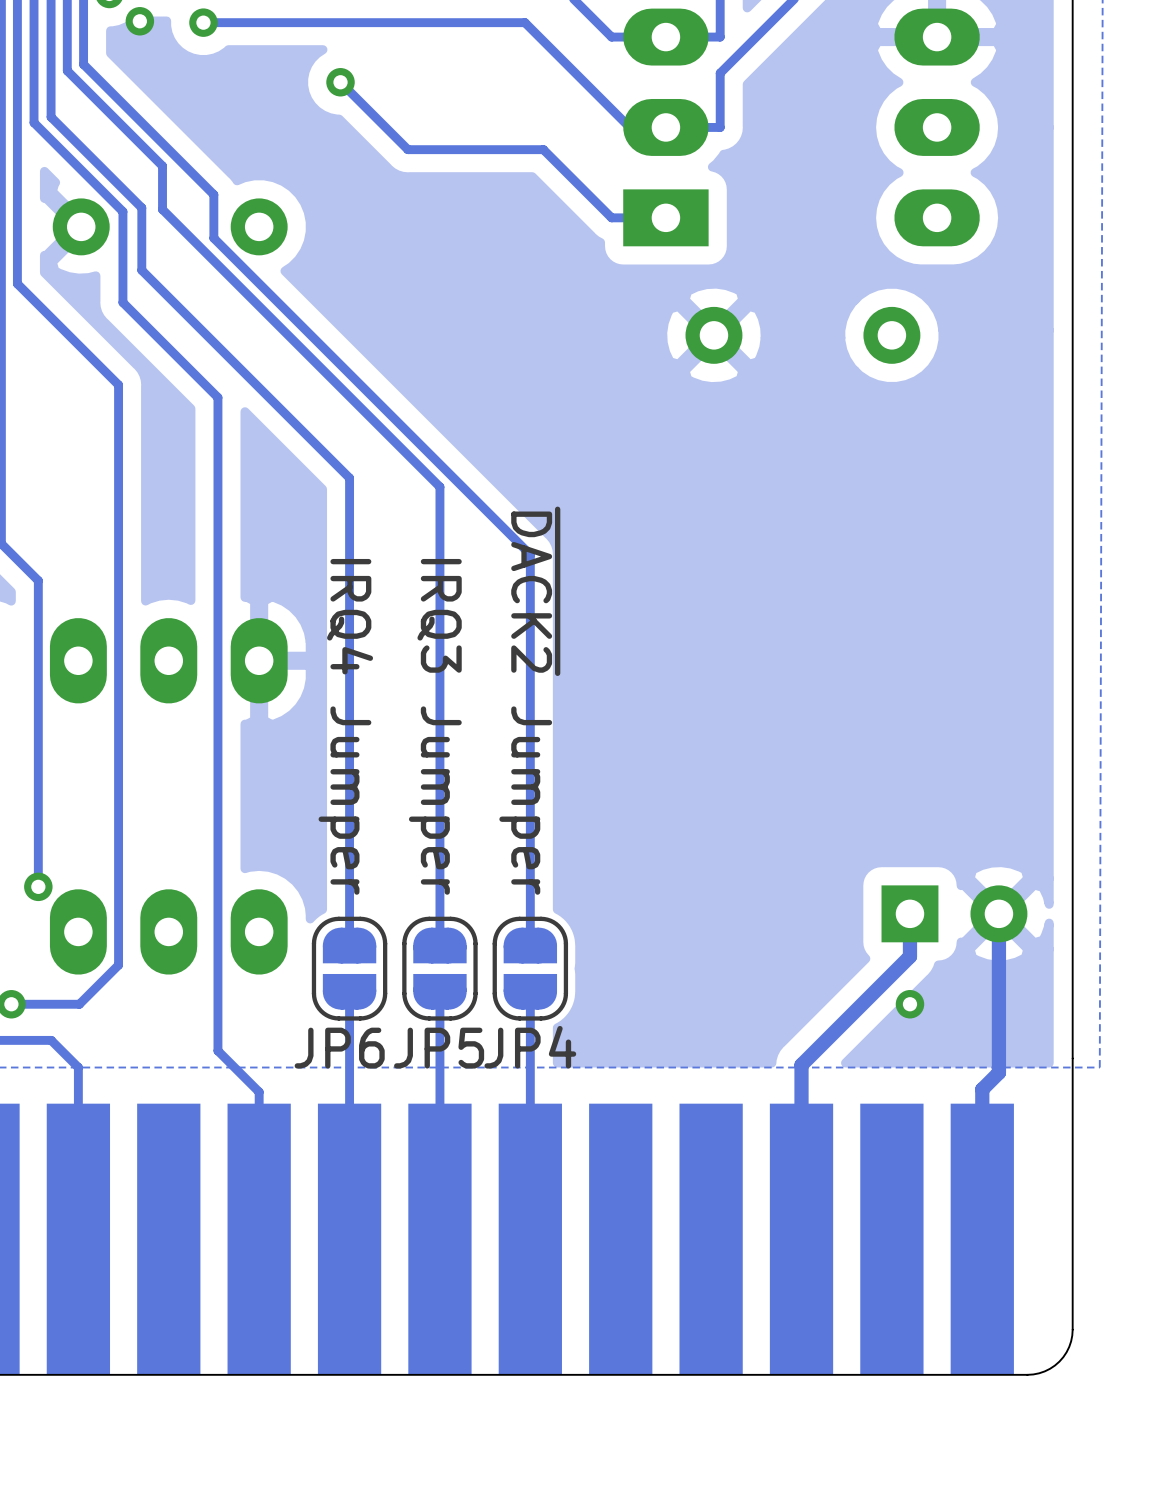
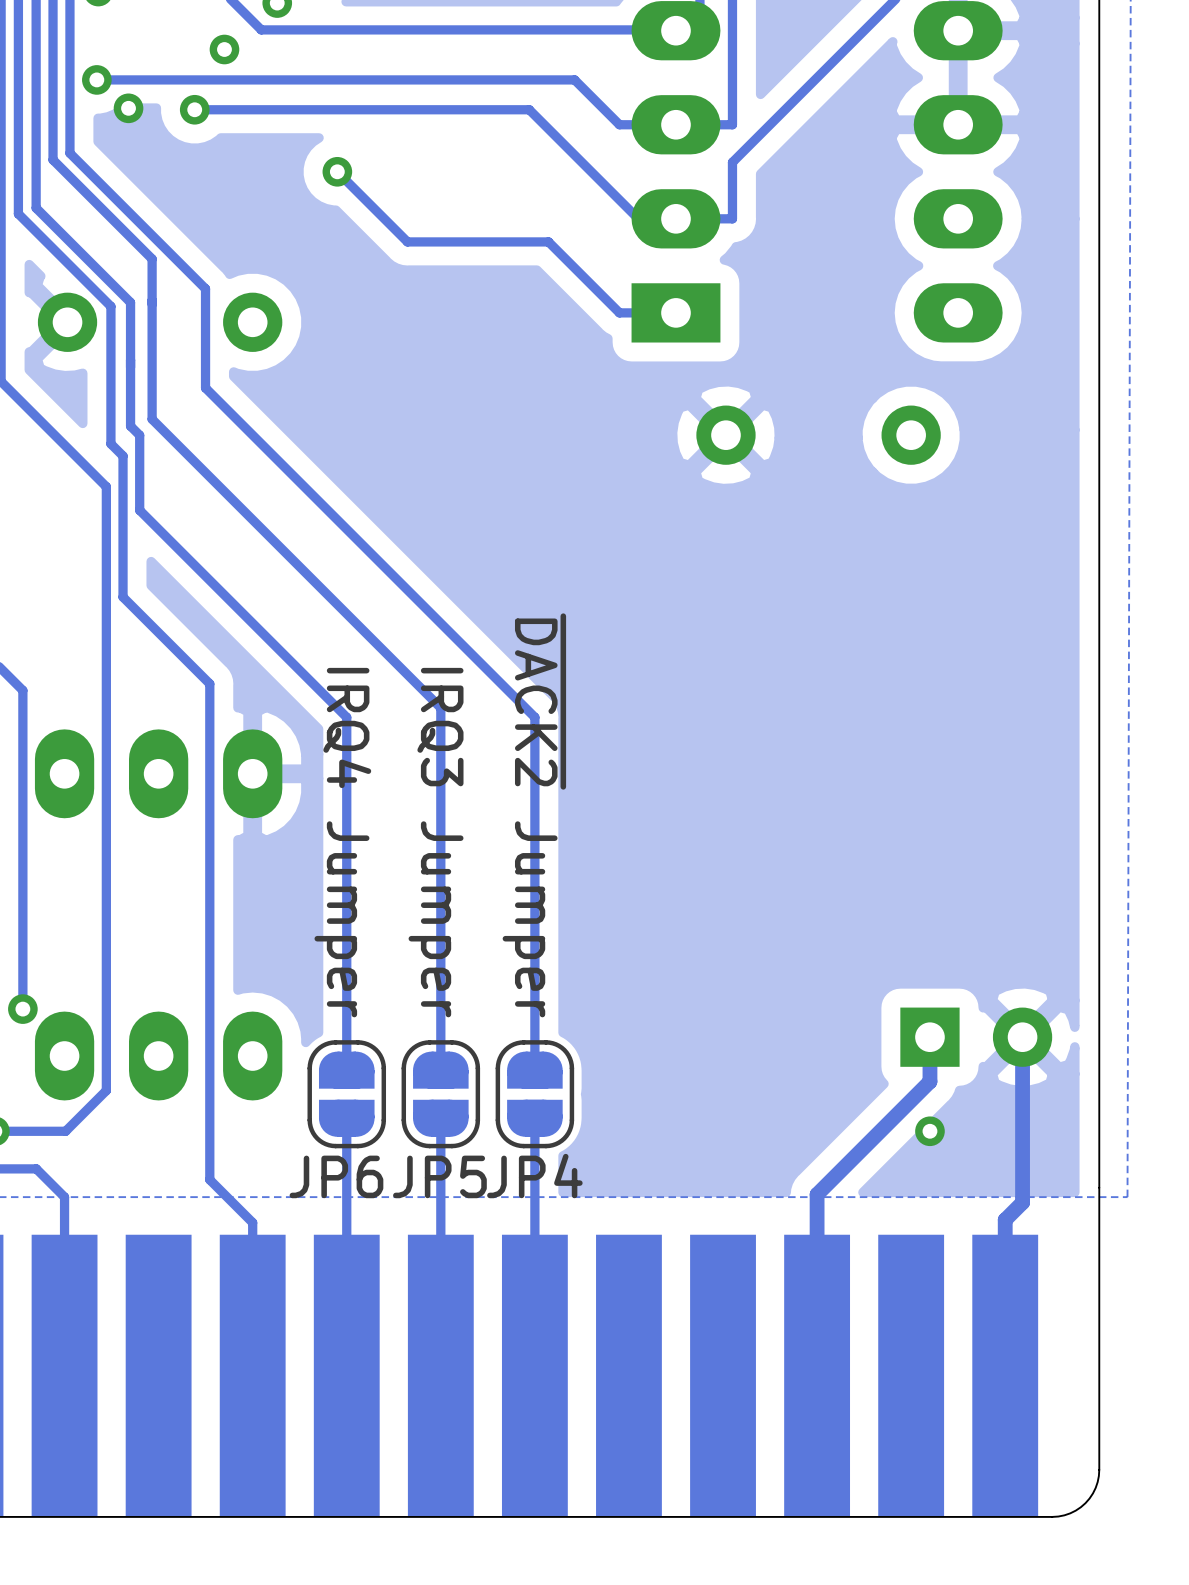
track: (162, 209) (439, 486) (439, 597) -> (152, 304) (152, 419) (440, 707)
track: (213, 238) (530, 554) (530, 606) -> (205, 334) (205, 388) (534, 717)
track: (141, 270) (349, 478) (349, 606) -> (130, 367) (130, 426) (139, 435) (139, 510) (346, 717)
track: (122, 302) (217, 397) (217, 574) -> (110, 401) (110, 443) (123, 456) (123, 597) (209, 683)

